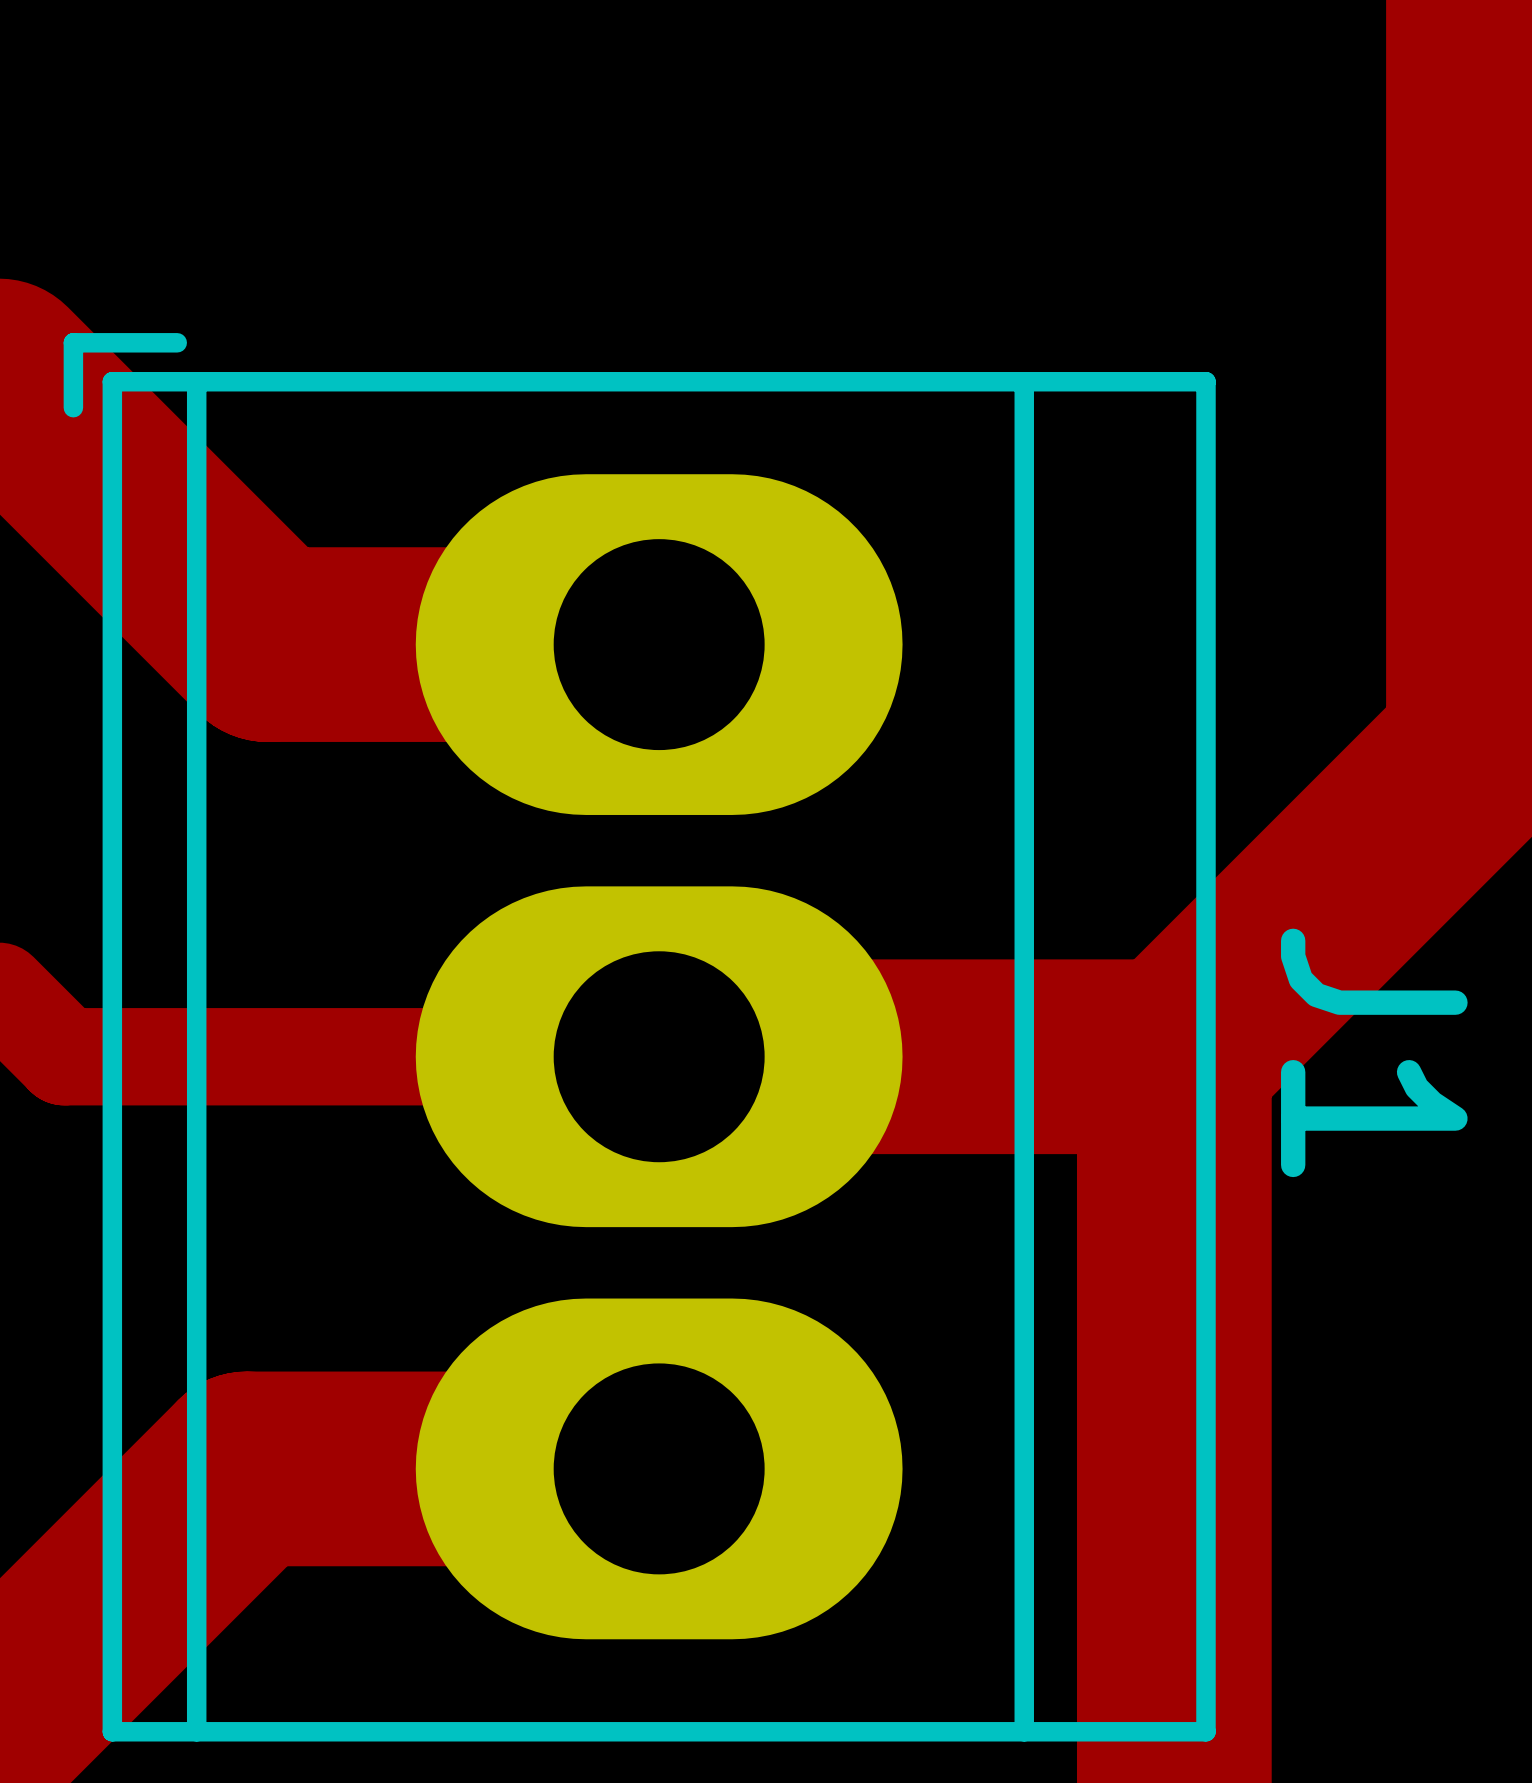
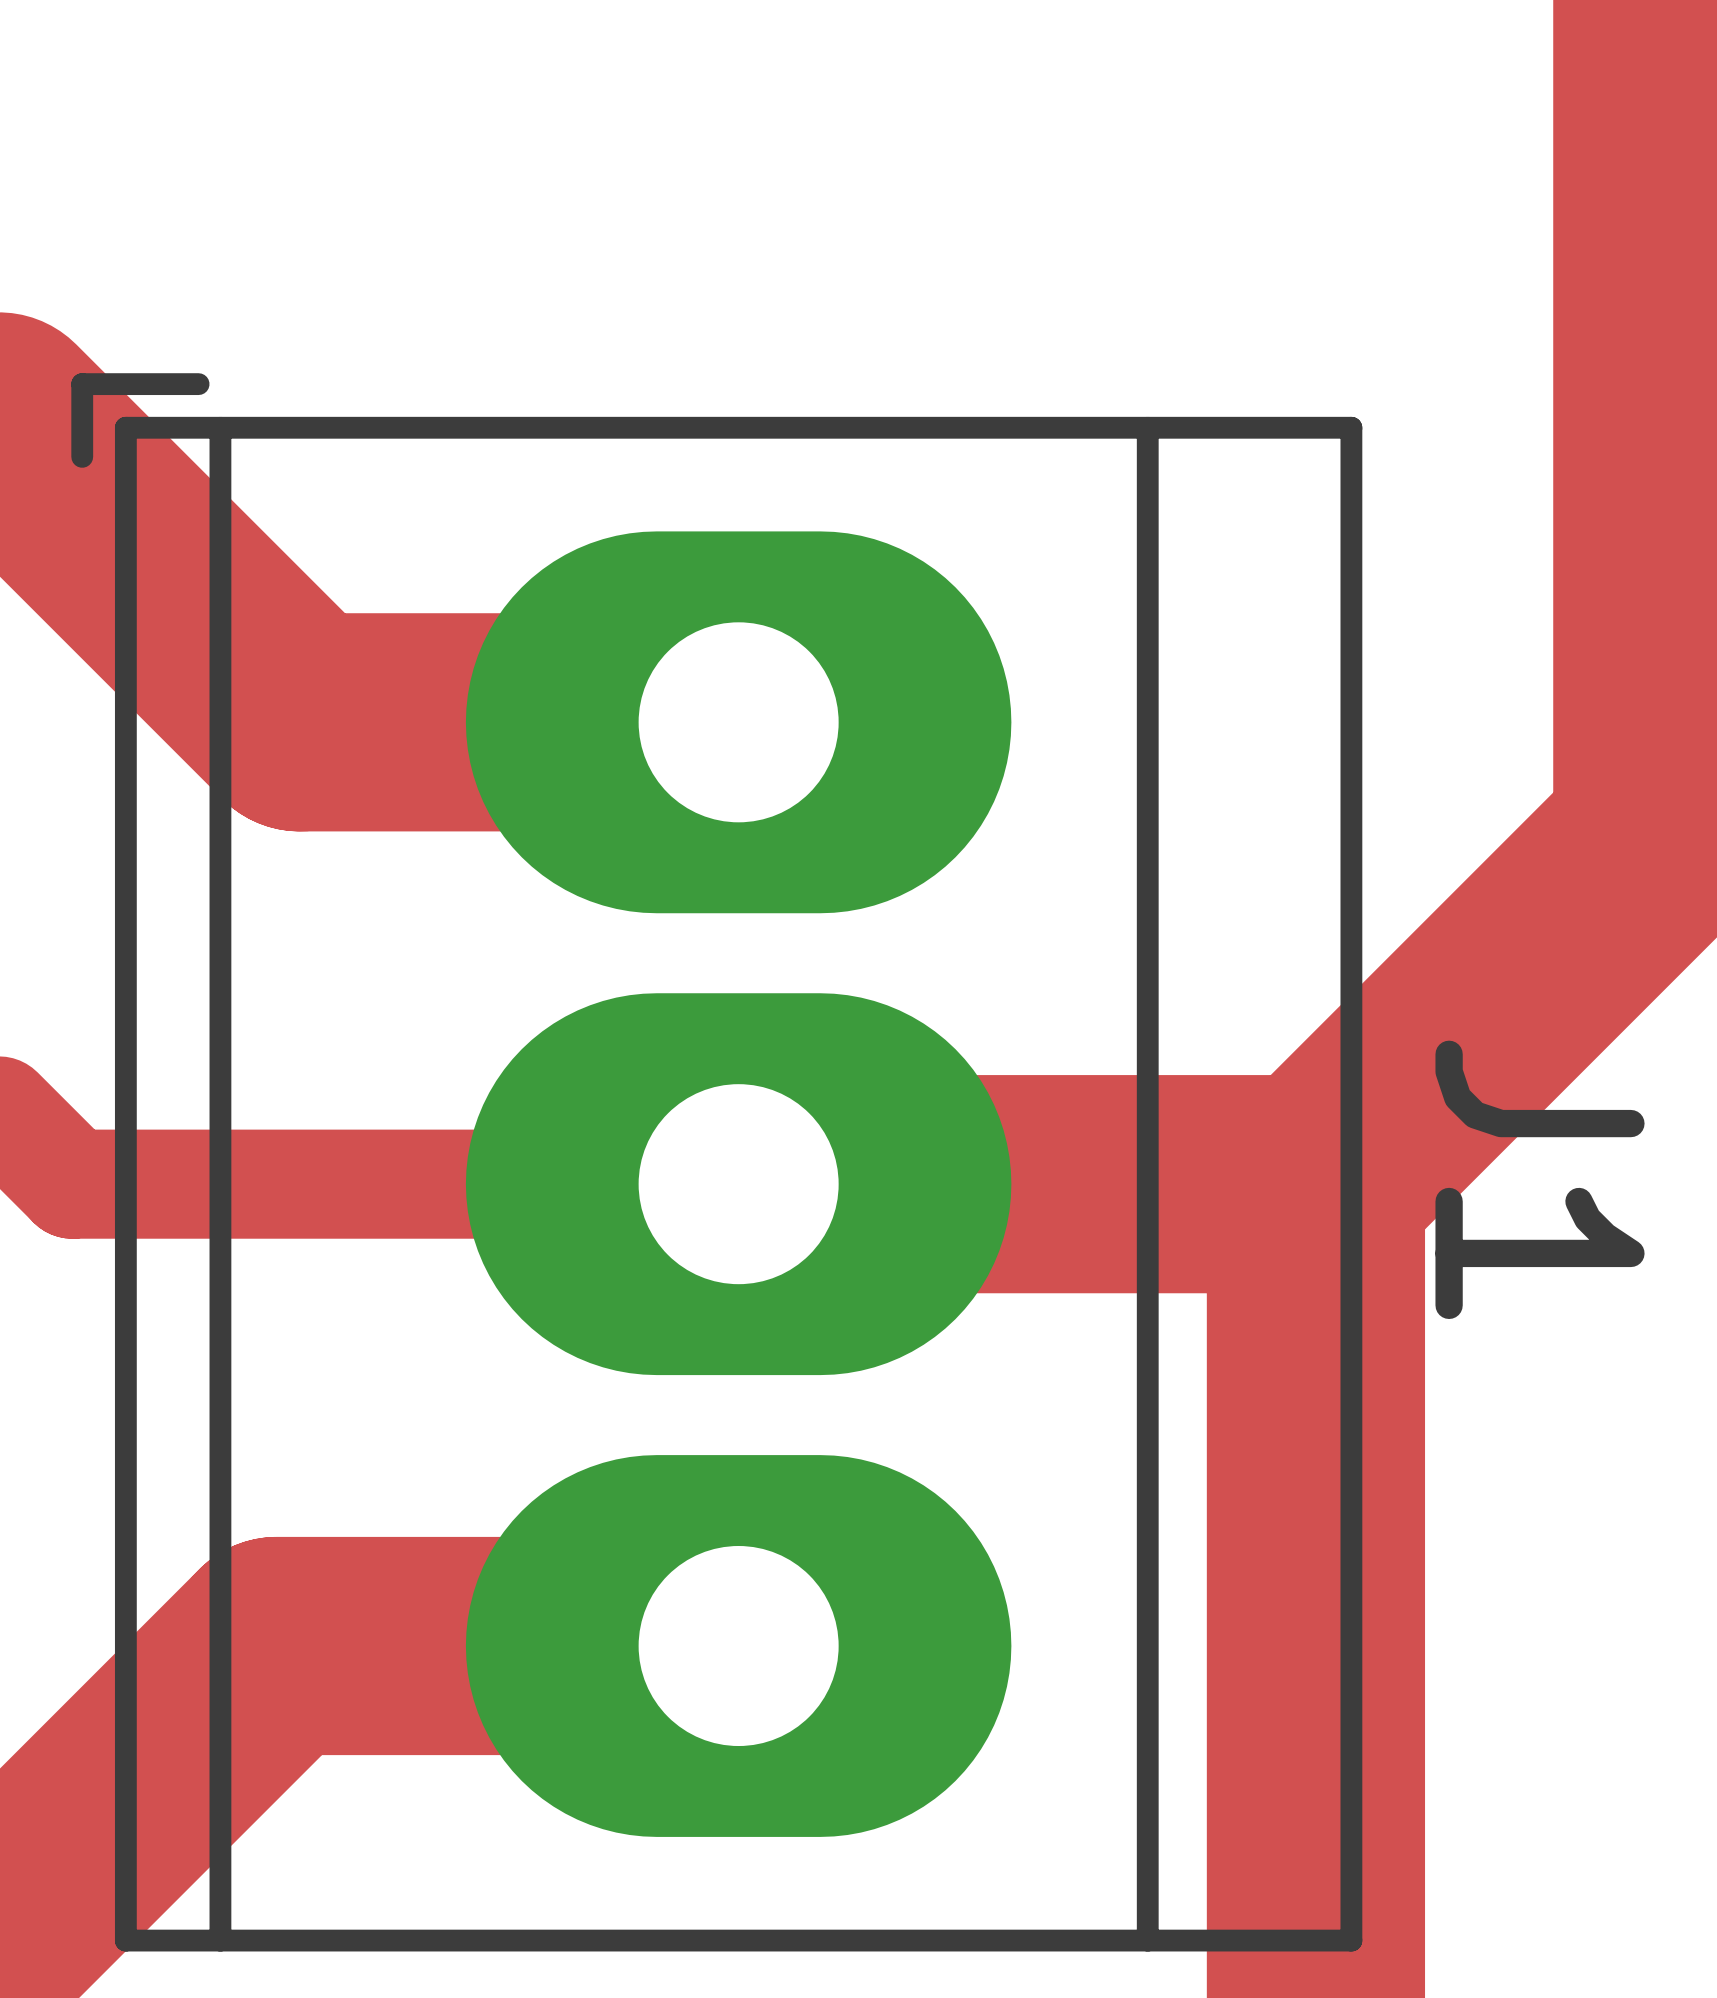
J1 footprint: [63, 333, 1216, 1742] -> [71, 373, 1363, 1952]

